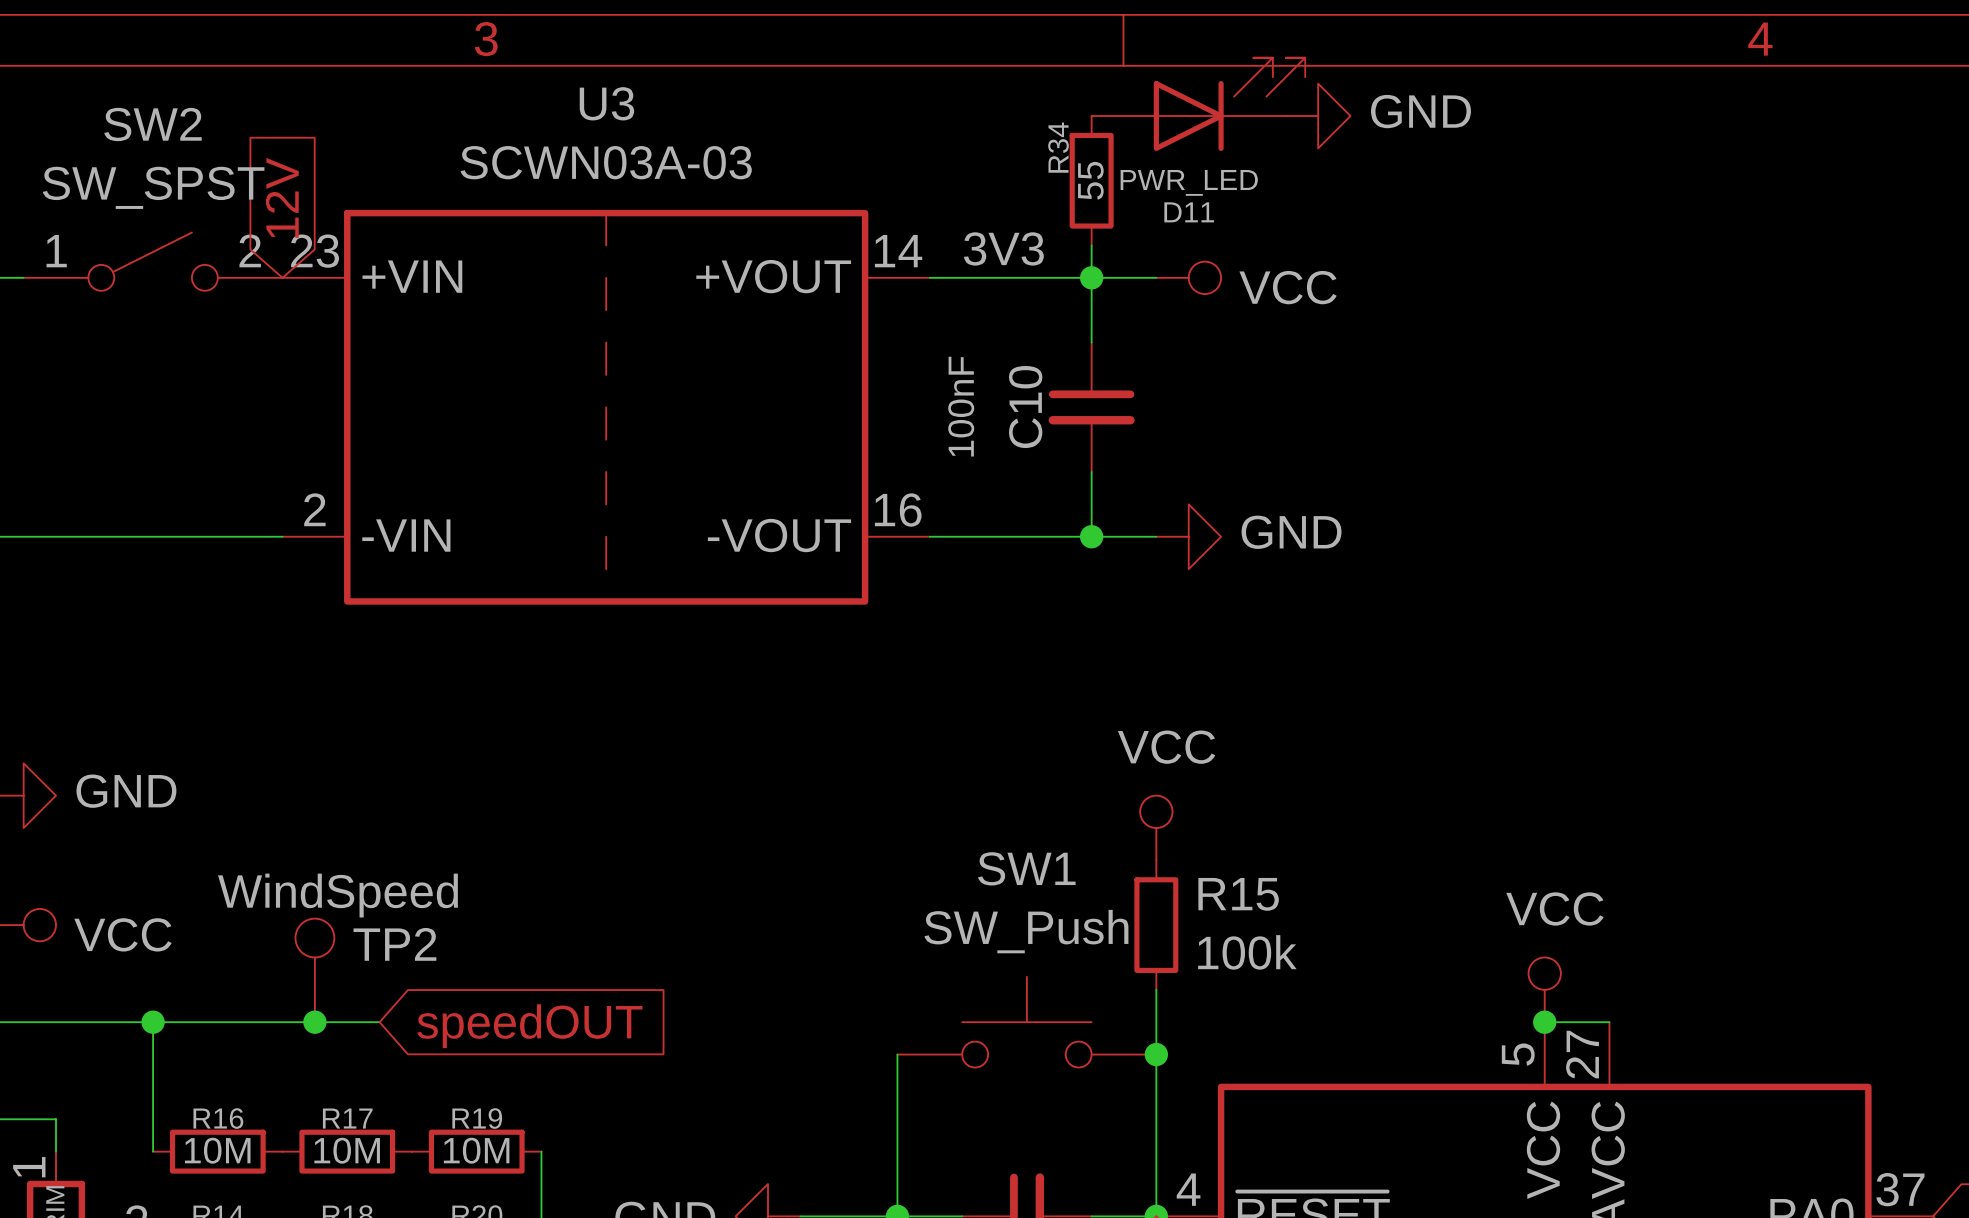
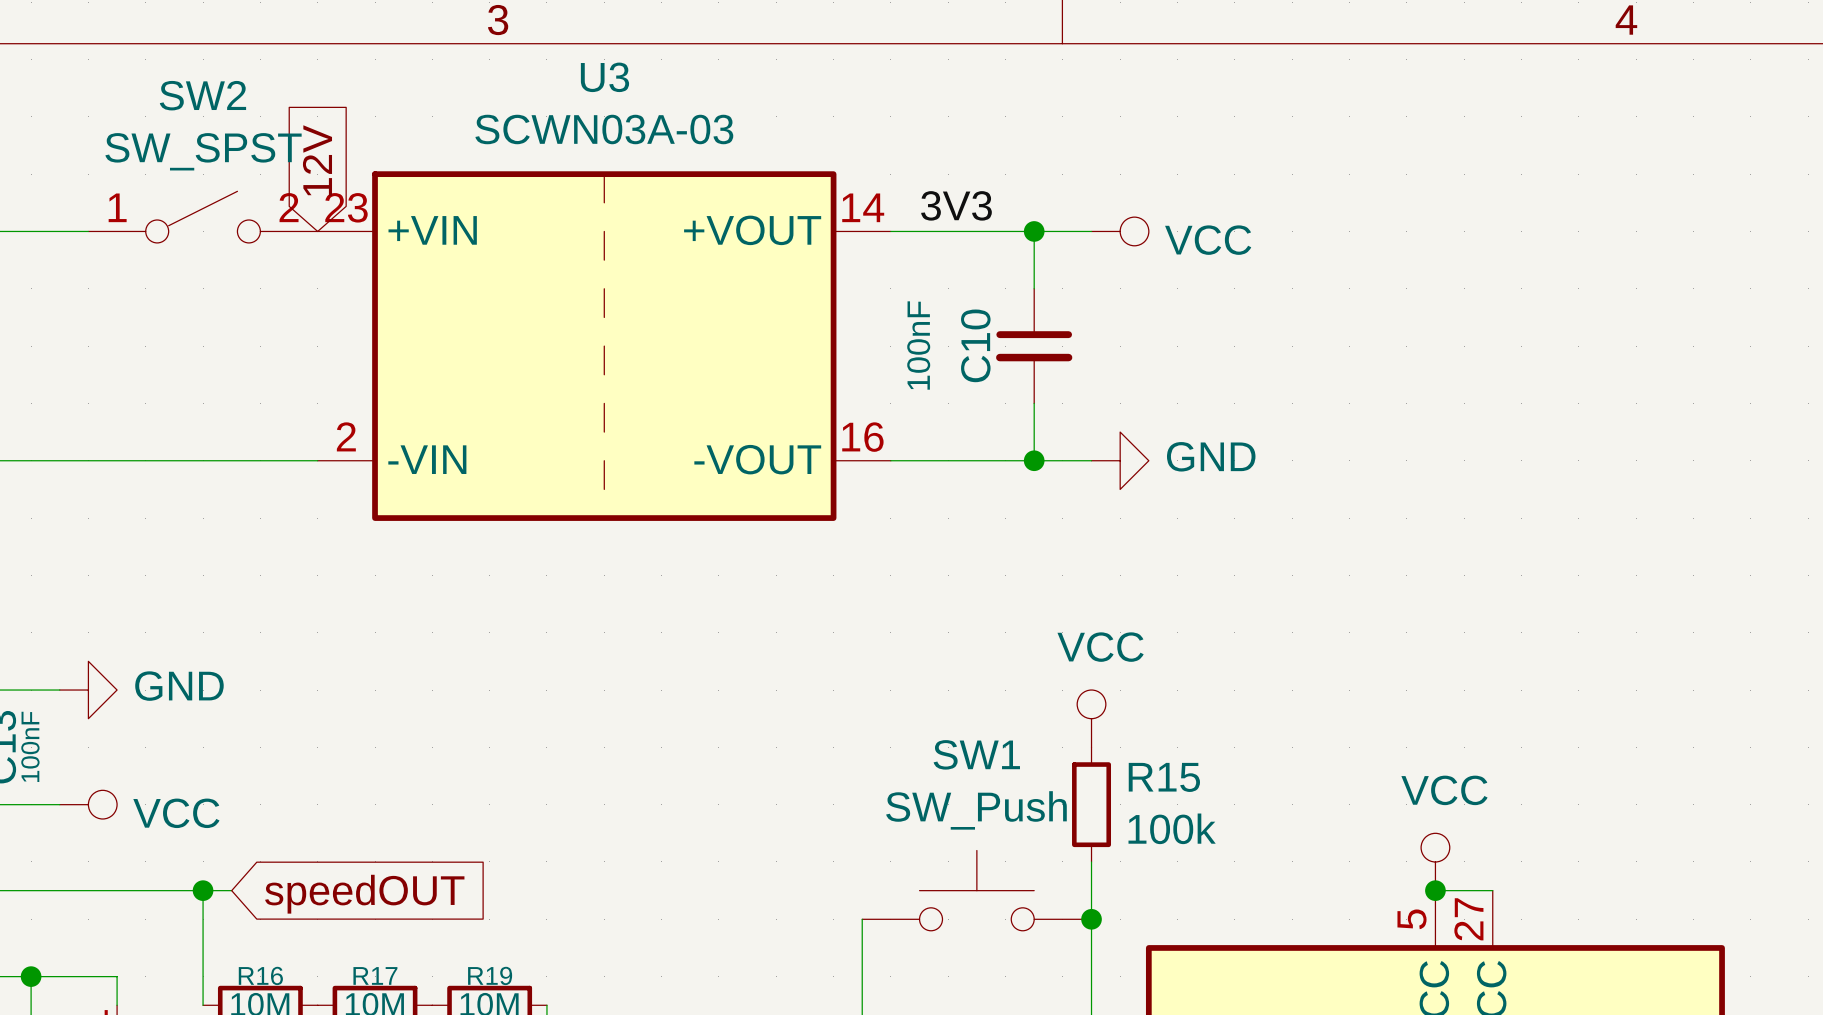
D11: PWR_LED (1198, 104) -> none
power symbol: GND (1318, 116) -> none
R34: 55 (1091, 180) -> none
wire: (1091, 245) (1091, 277) -> none
TP2: WindSpeed (314, 970) -> none
wire: (185, 1022) (379, 1022) -> none
junction: (314, 1022) -> none
global label position: speedOUT (529, 1026) -> speedOUT (364, 894)

